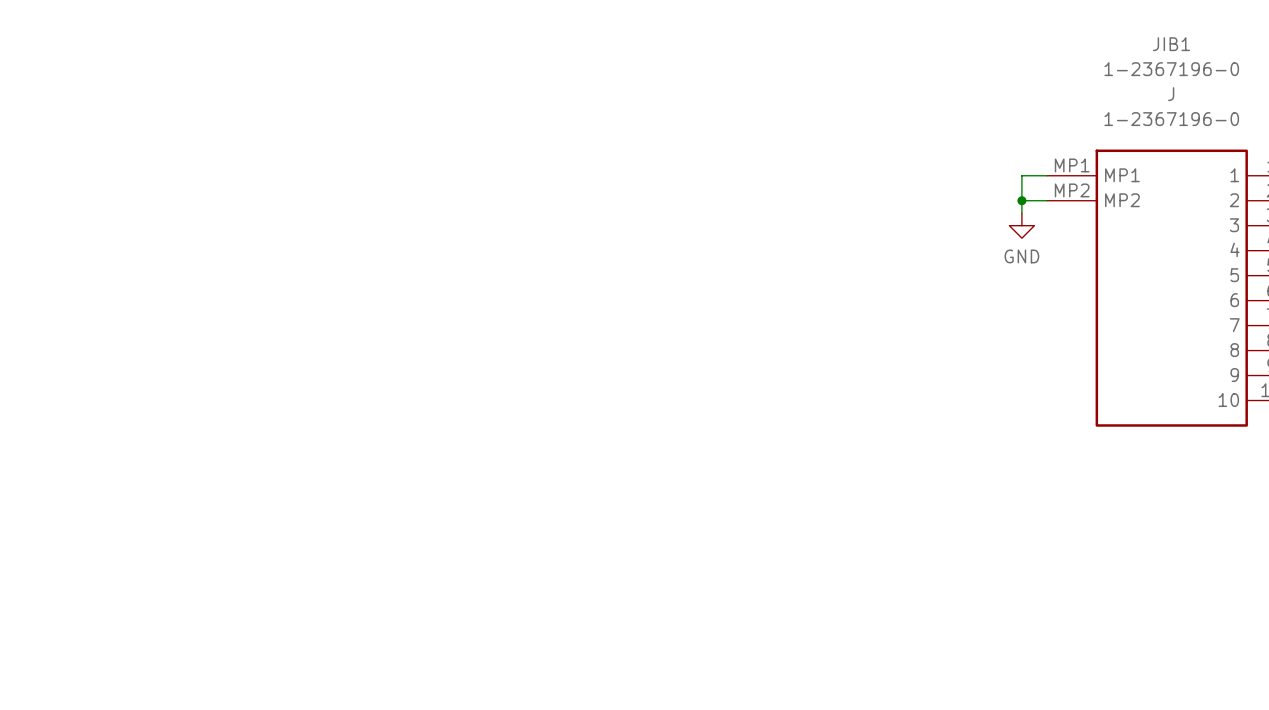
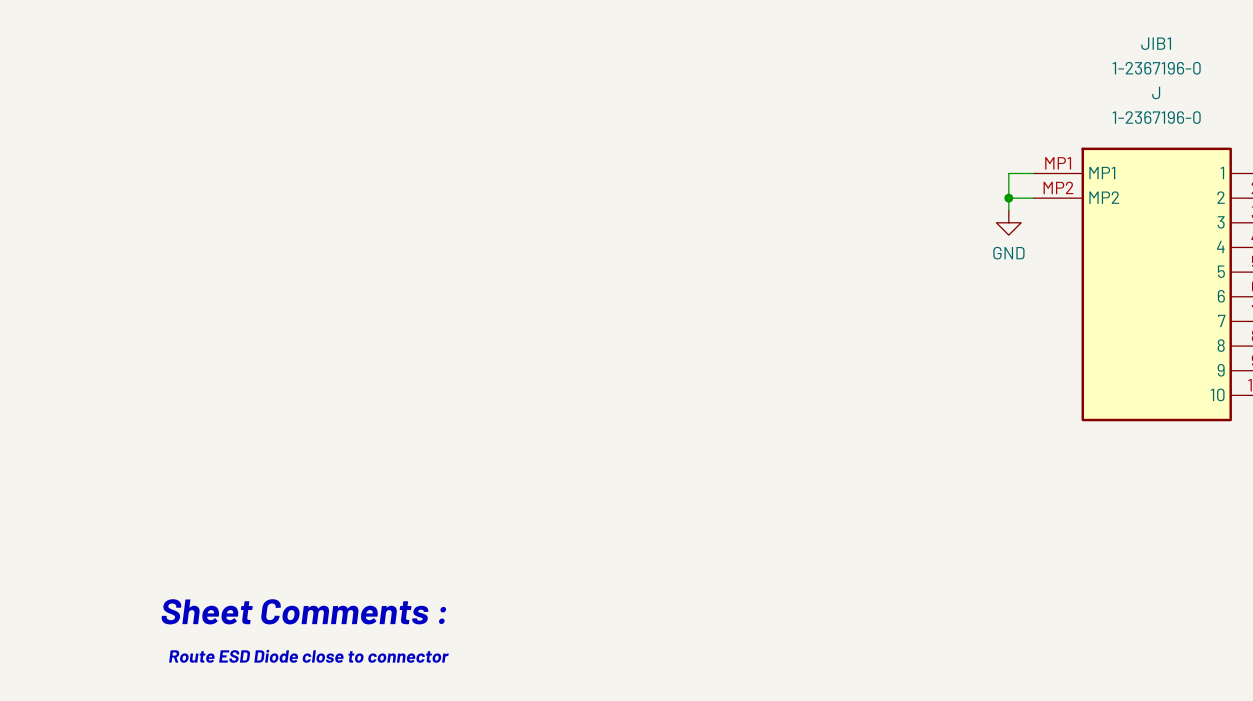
text: none -> Sheet Comments : (303, 611)
text: none -> Route ESD Diode close to connector (309, 656)

